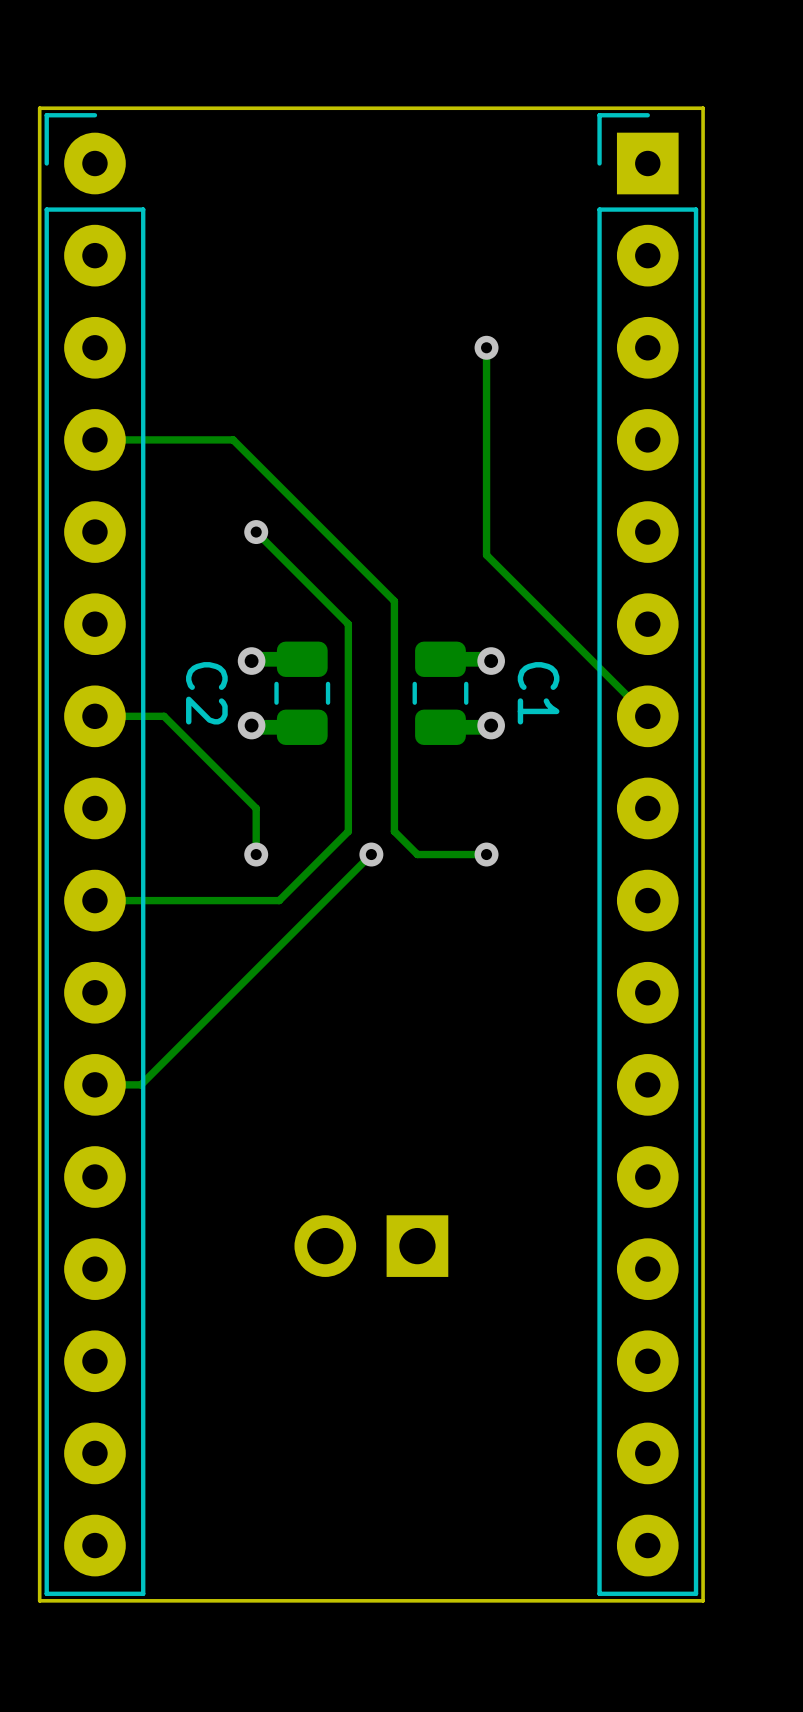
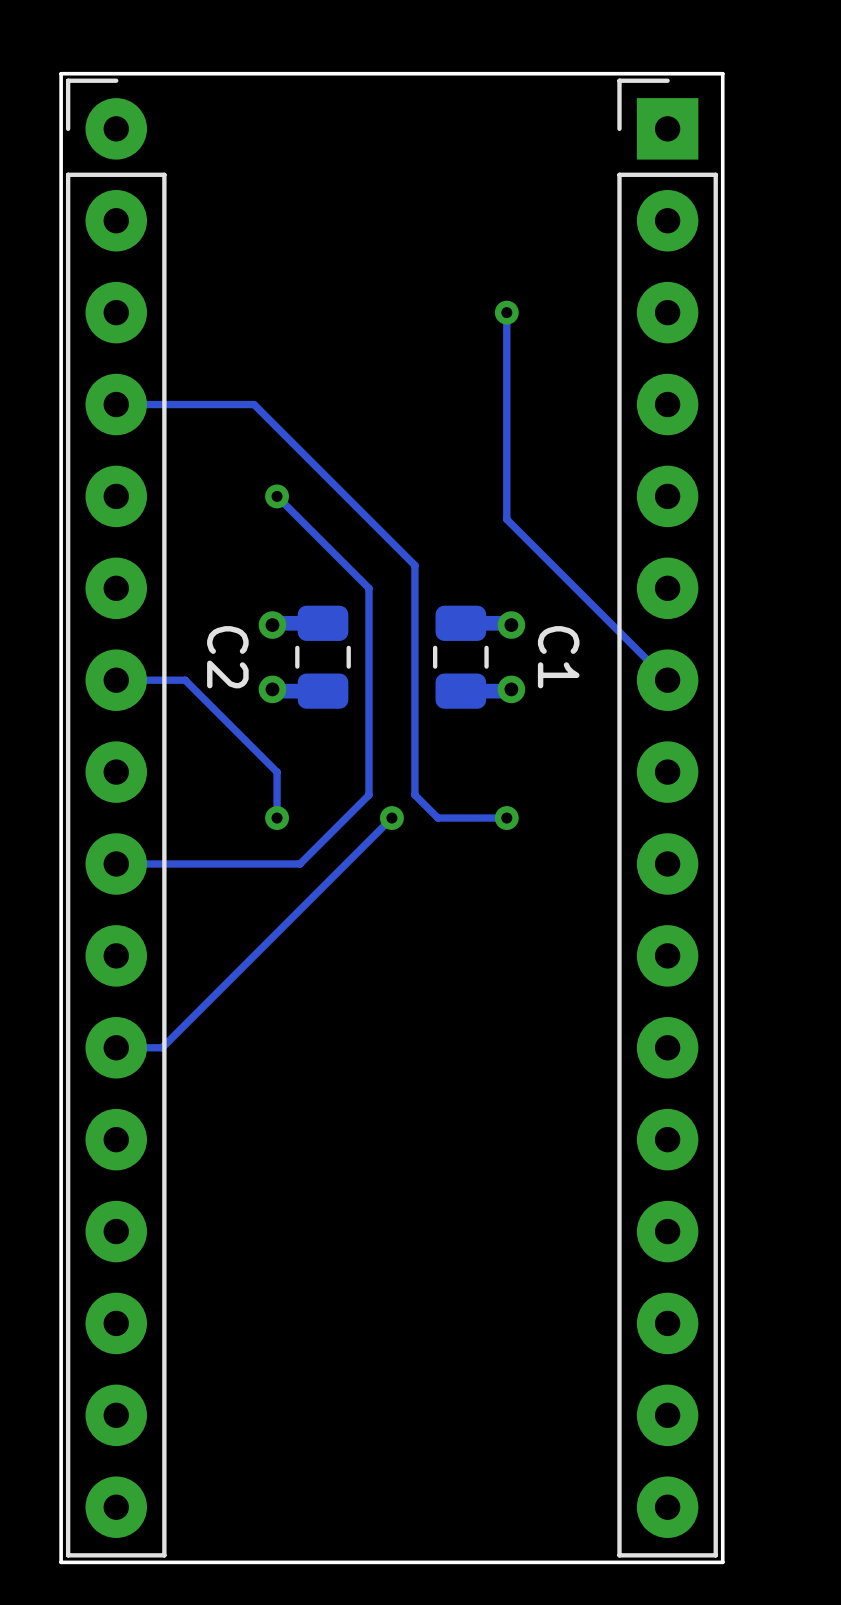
part: (371, 1246) -> none

